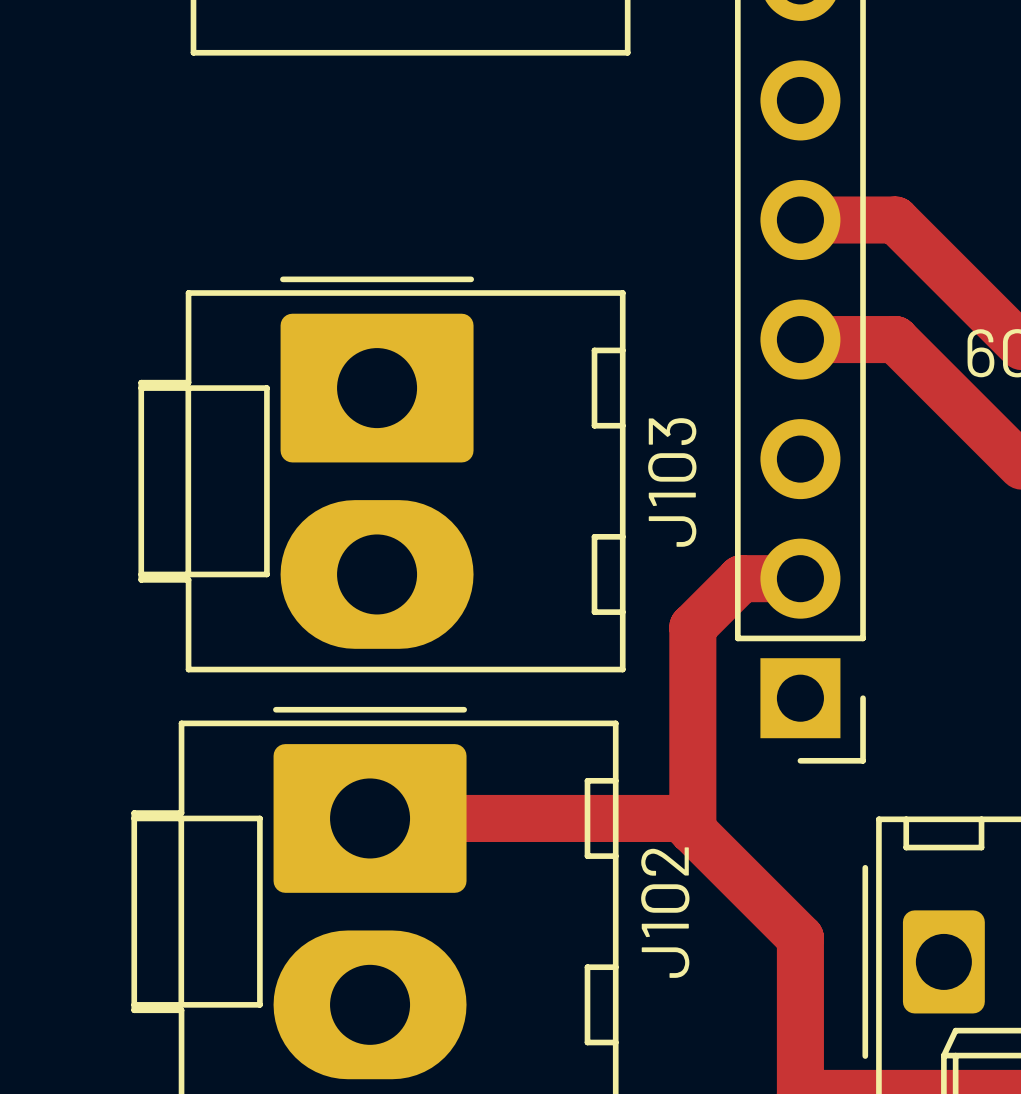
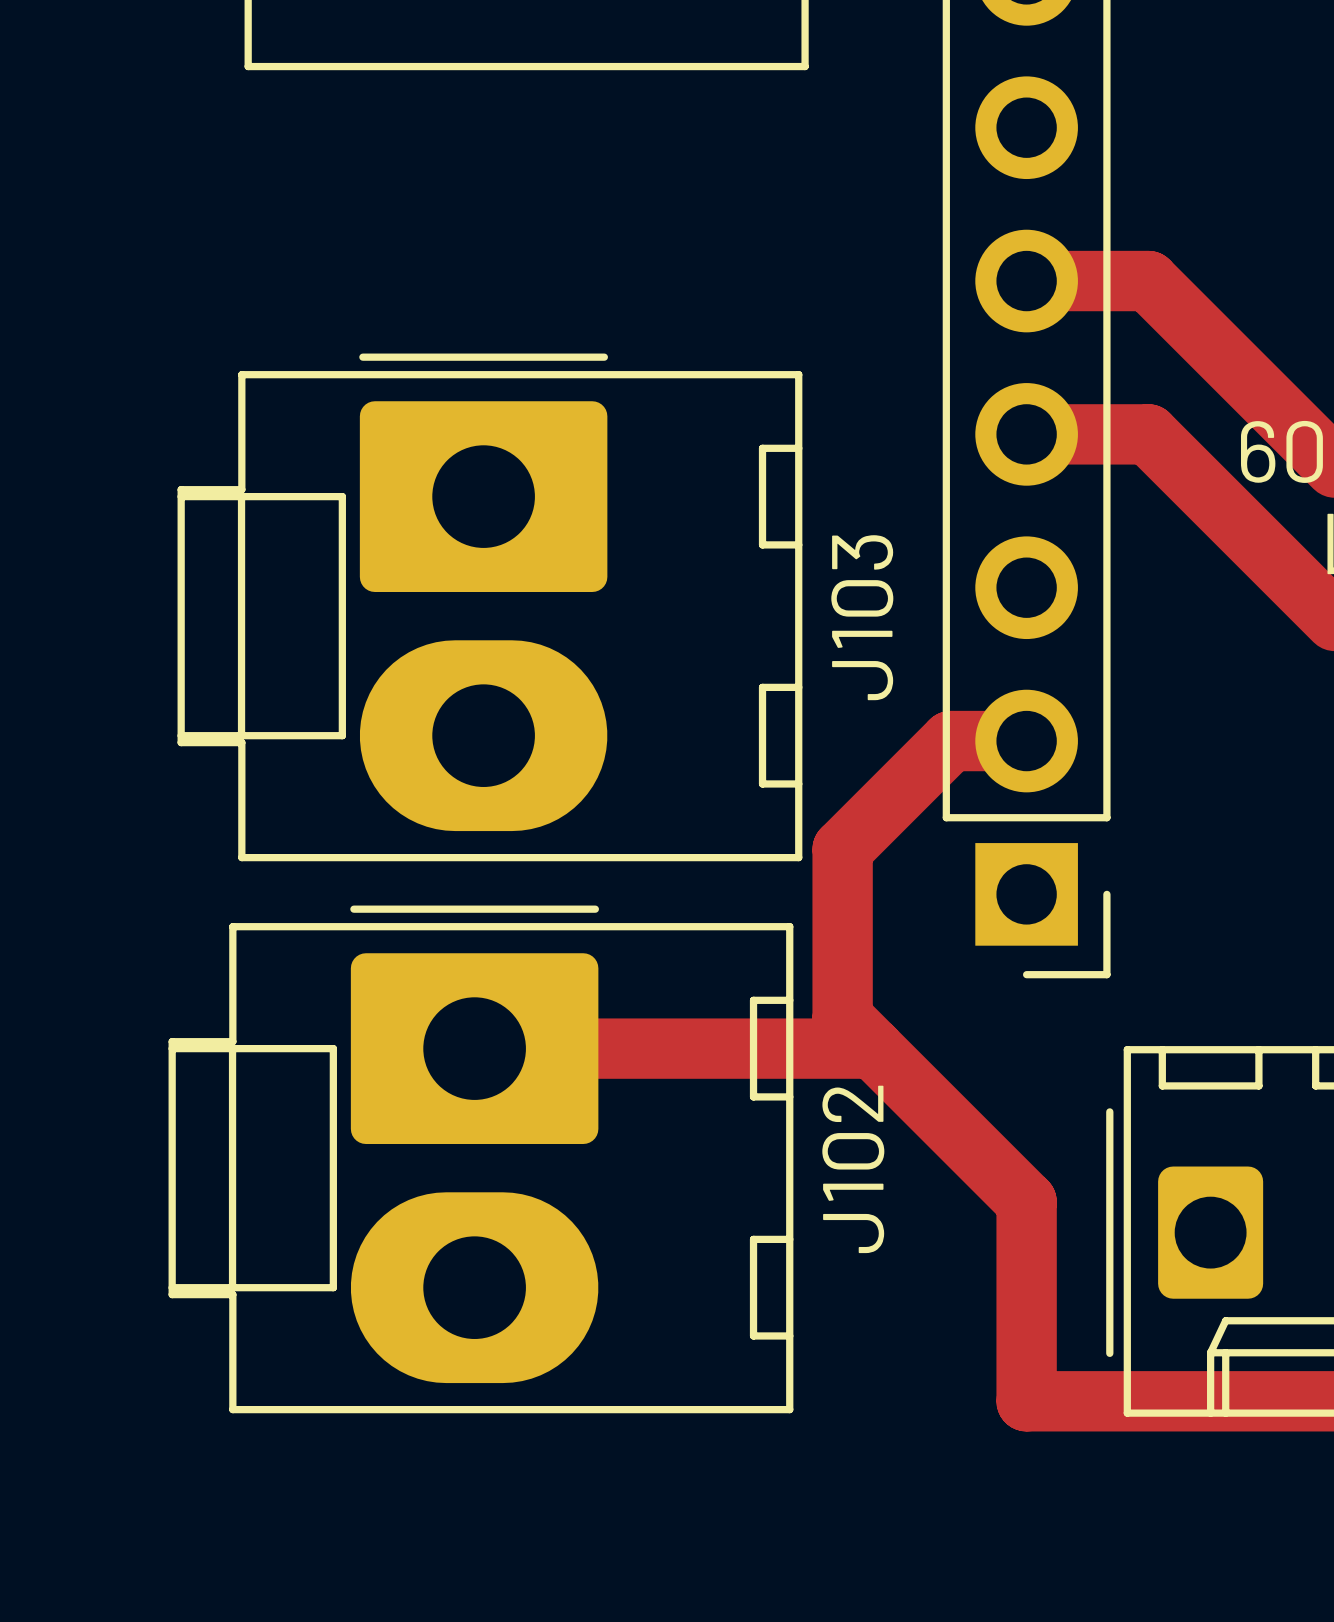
track: (692, 627) (692, 830) -> (888, 803) (842, 849) (842, 1017) (873, 1048)

